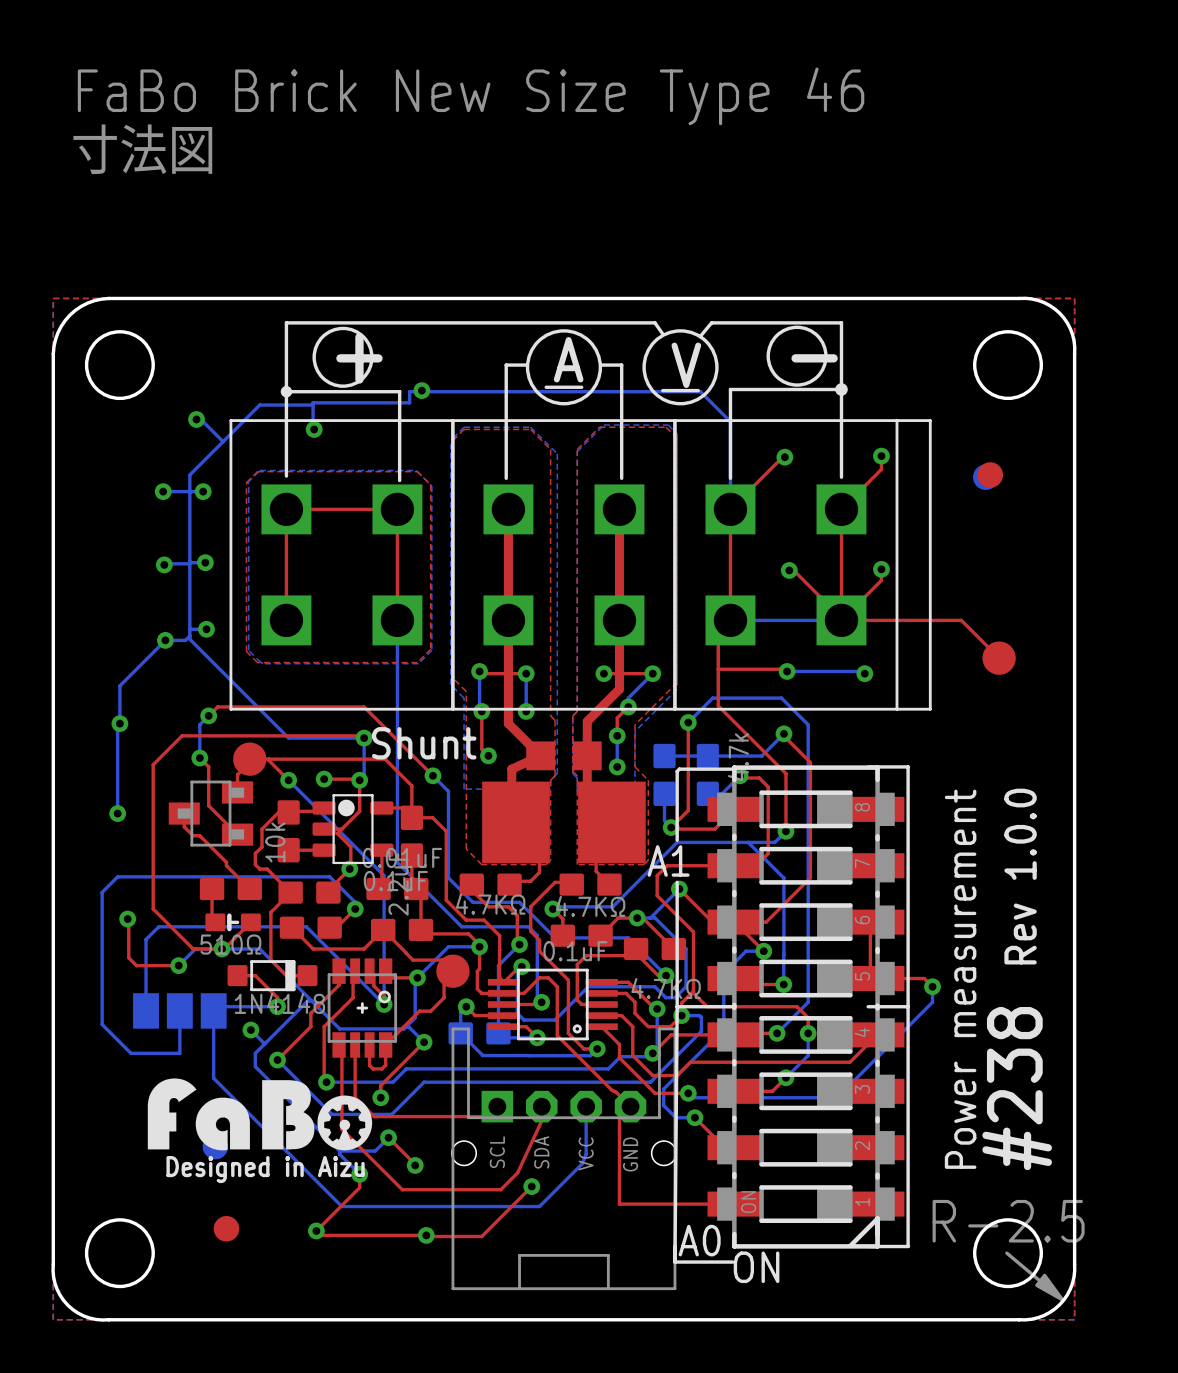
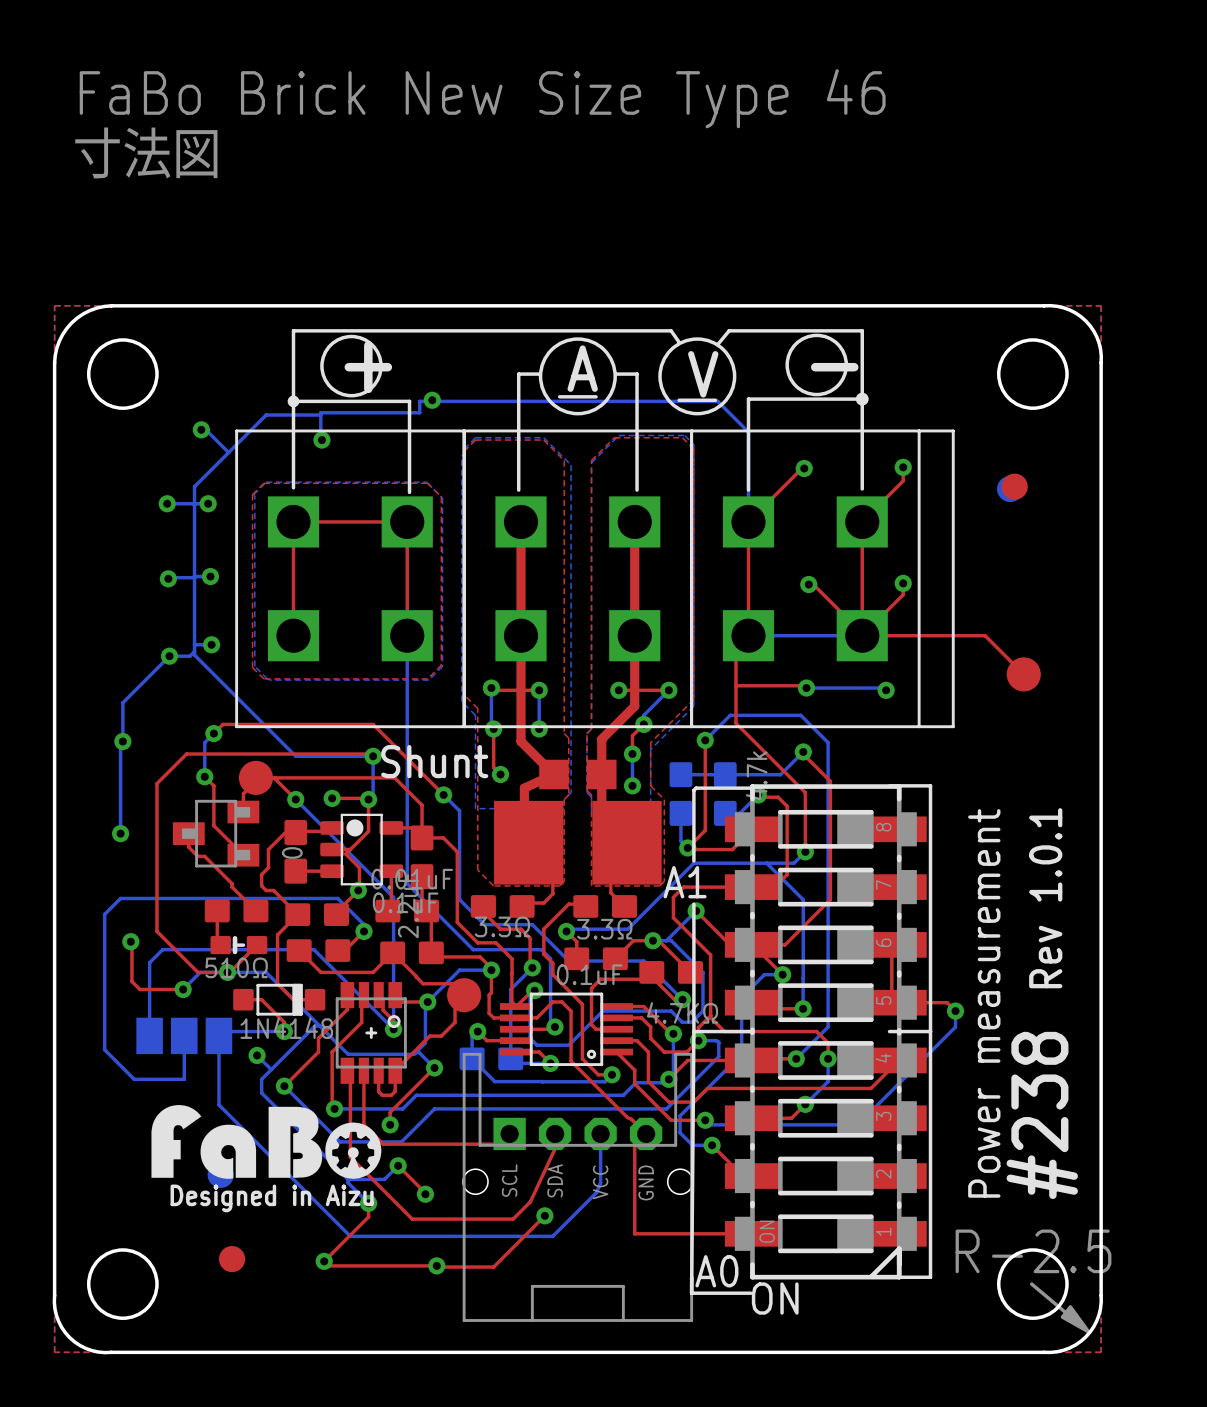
part value: 10k (275, 842) -> 0 (292, 852)
text: Rev 1.0.0 (1020, 876) -> Rev 1.0.1 (1045, 898)
part value: 4.7KΩ (490, 904) -> 3.3Ω (502, 926)
part value: 4.7KΩ (590, 906) -> 3.3Ω (604, 929)

